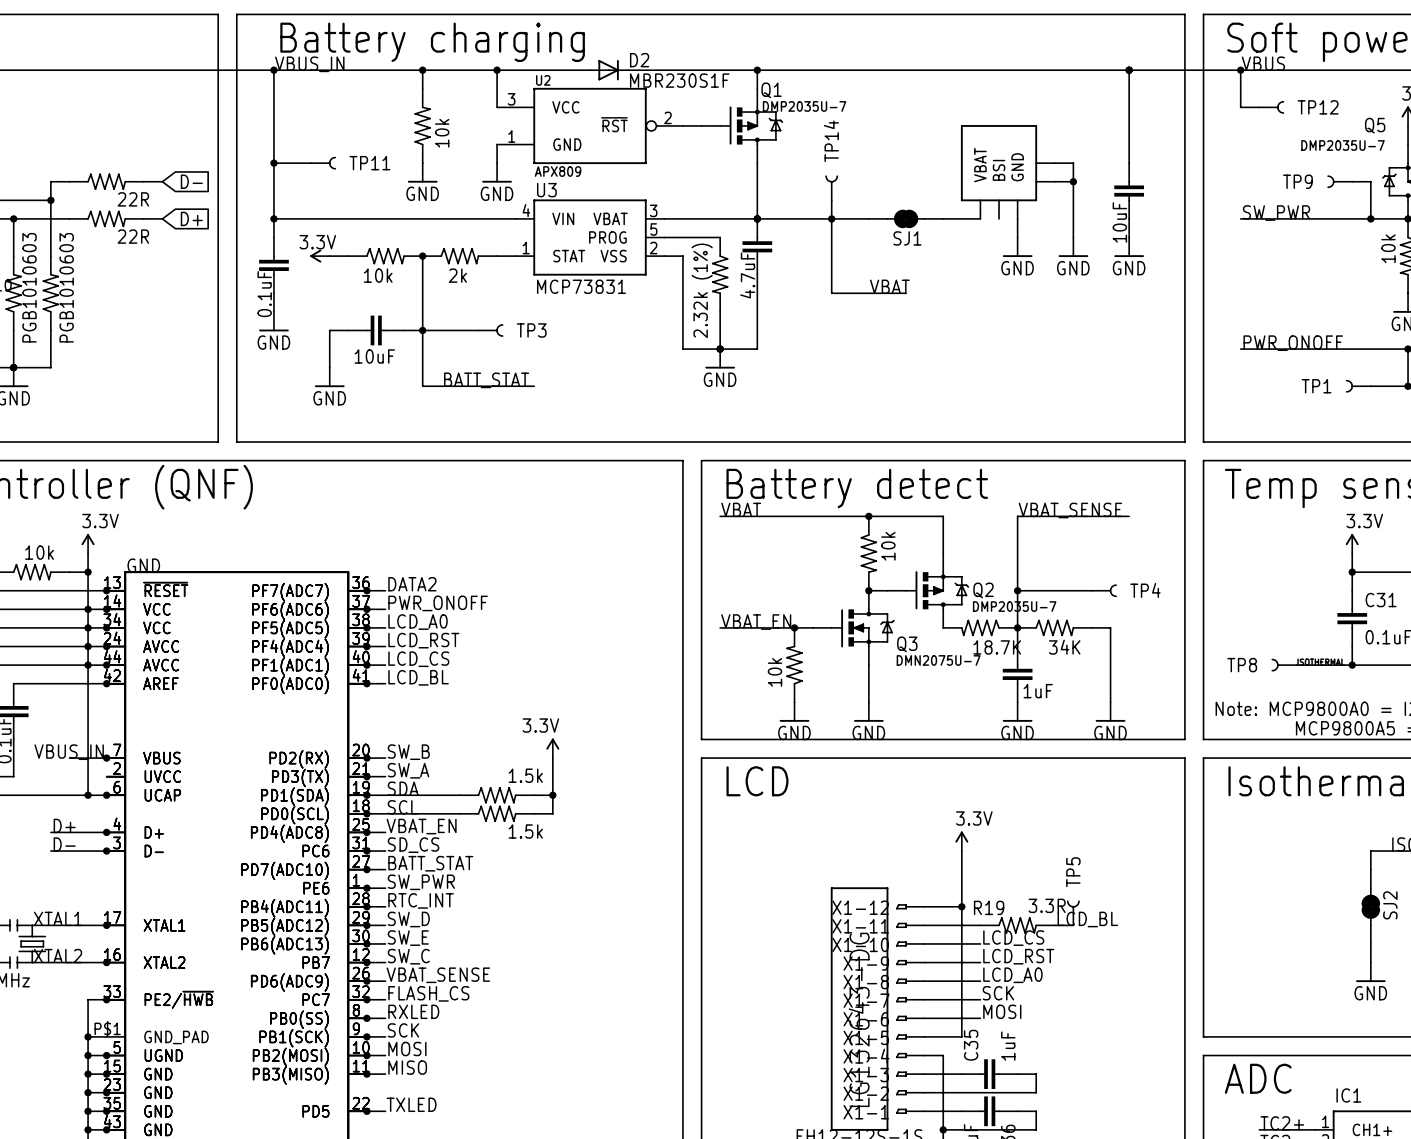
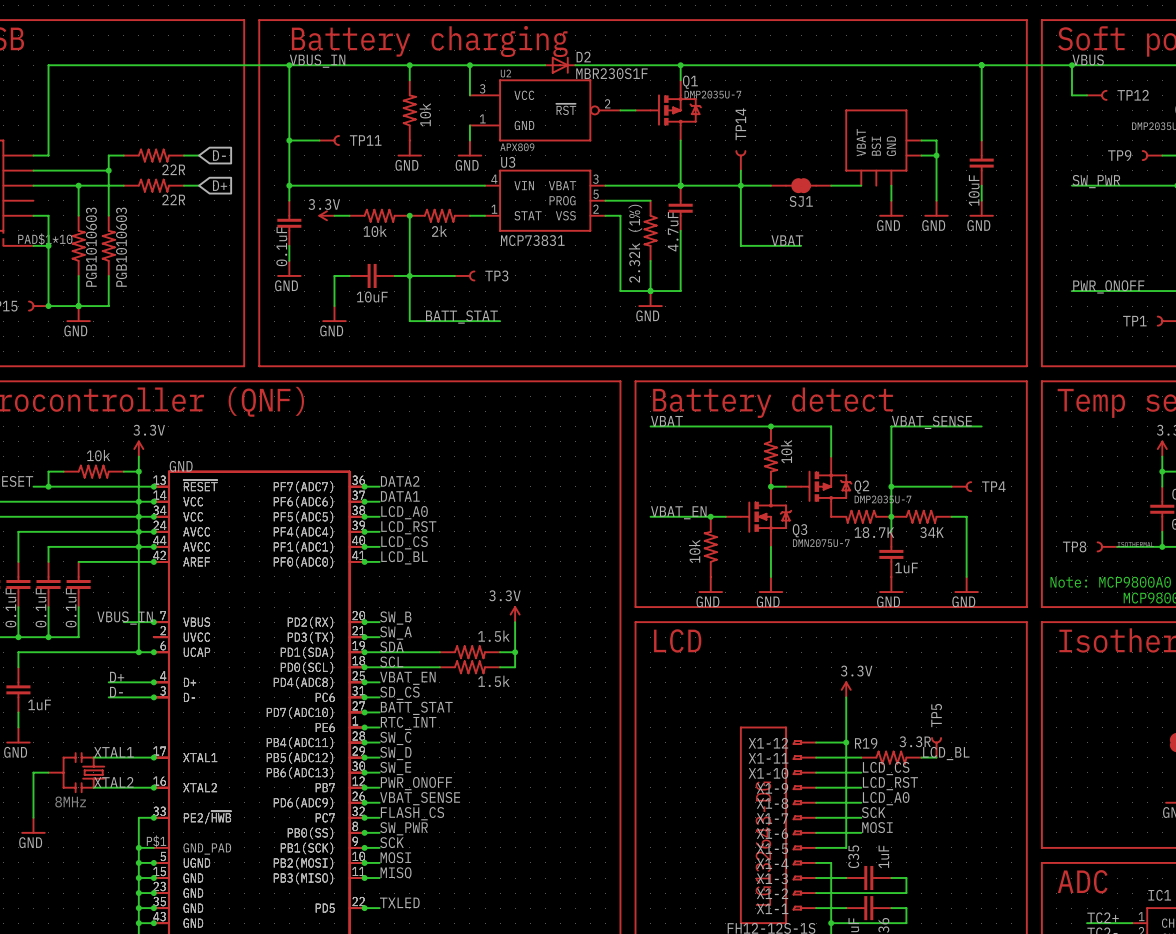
label: PWR_ONOFF (438, 603) -> DATA1 (400, 496)
label: SW_PWR (421, 882) -> RTC_INT (408, 723)
label: RTC_INT (421, 900) -> SW_C (395, 738)
label: SW_C (408, 956) -> PWR_ONOFF (416, 783)
label: RXLED (413, 1011) -> SW_PWR (404, 828)

